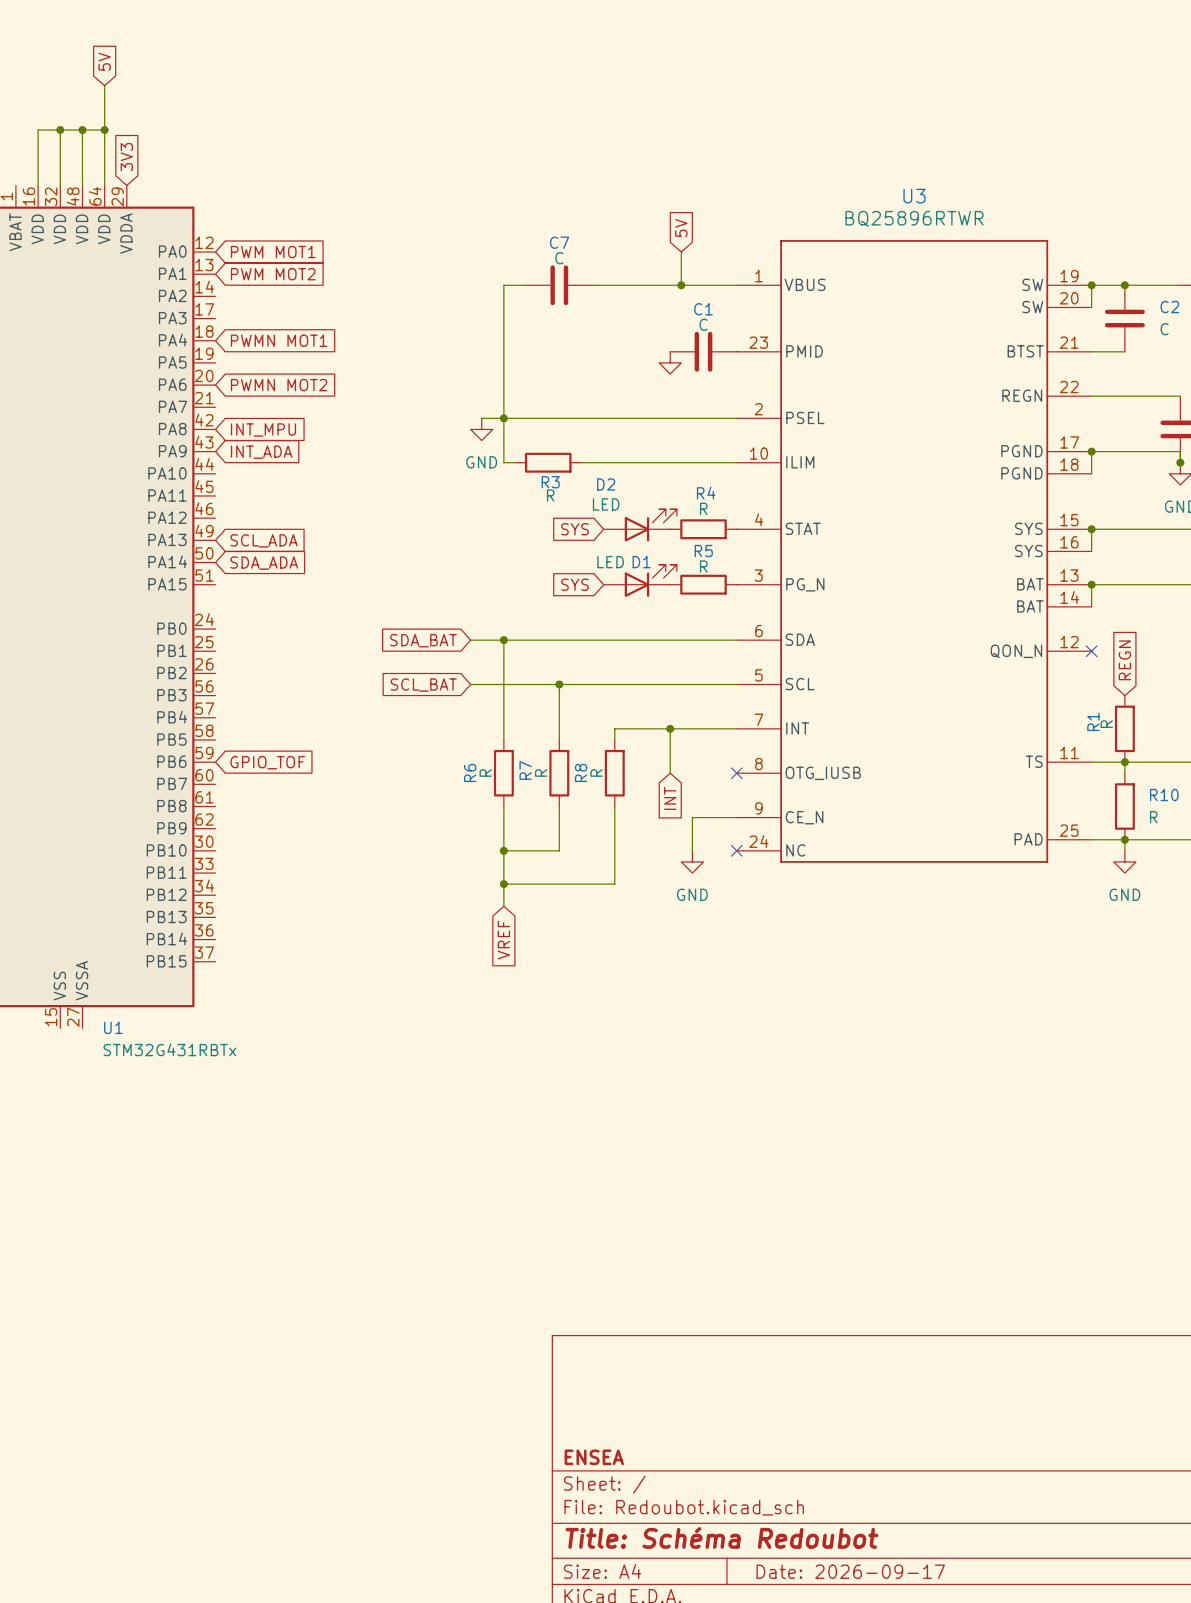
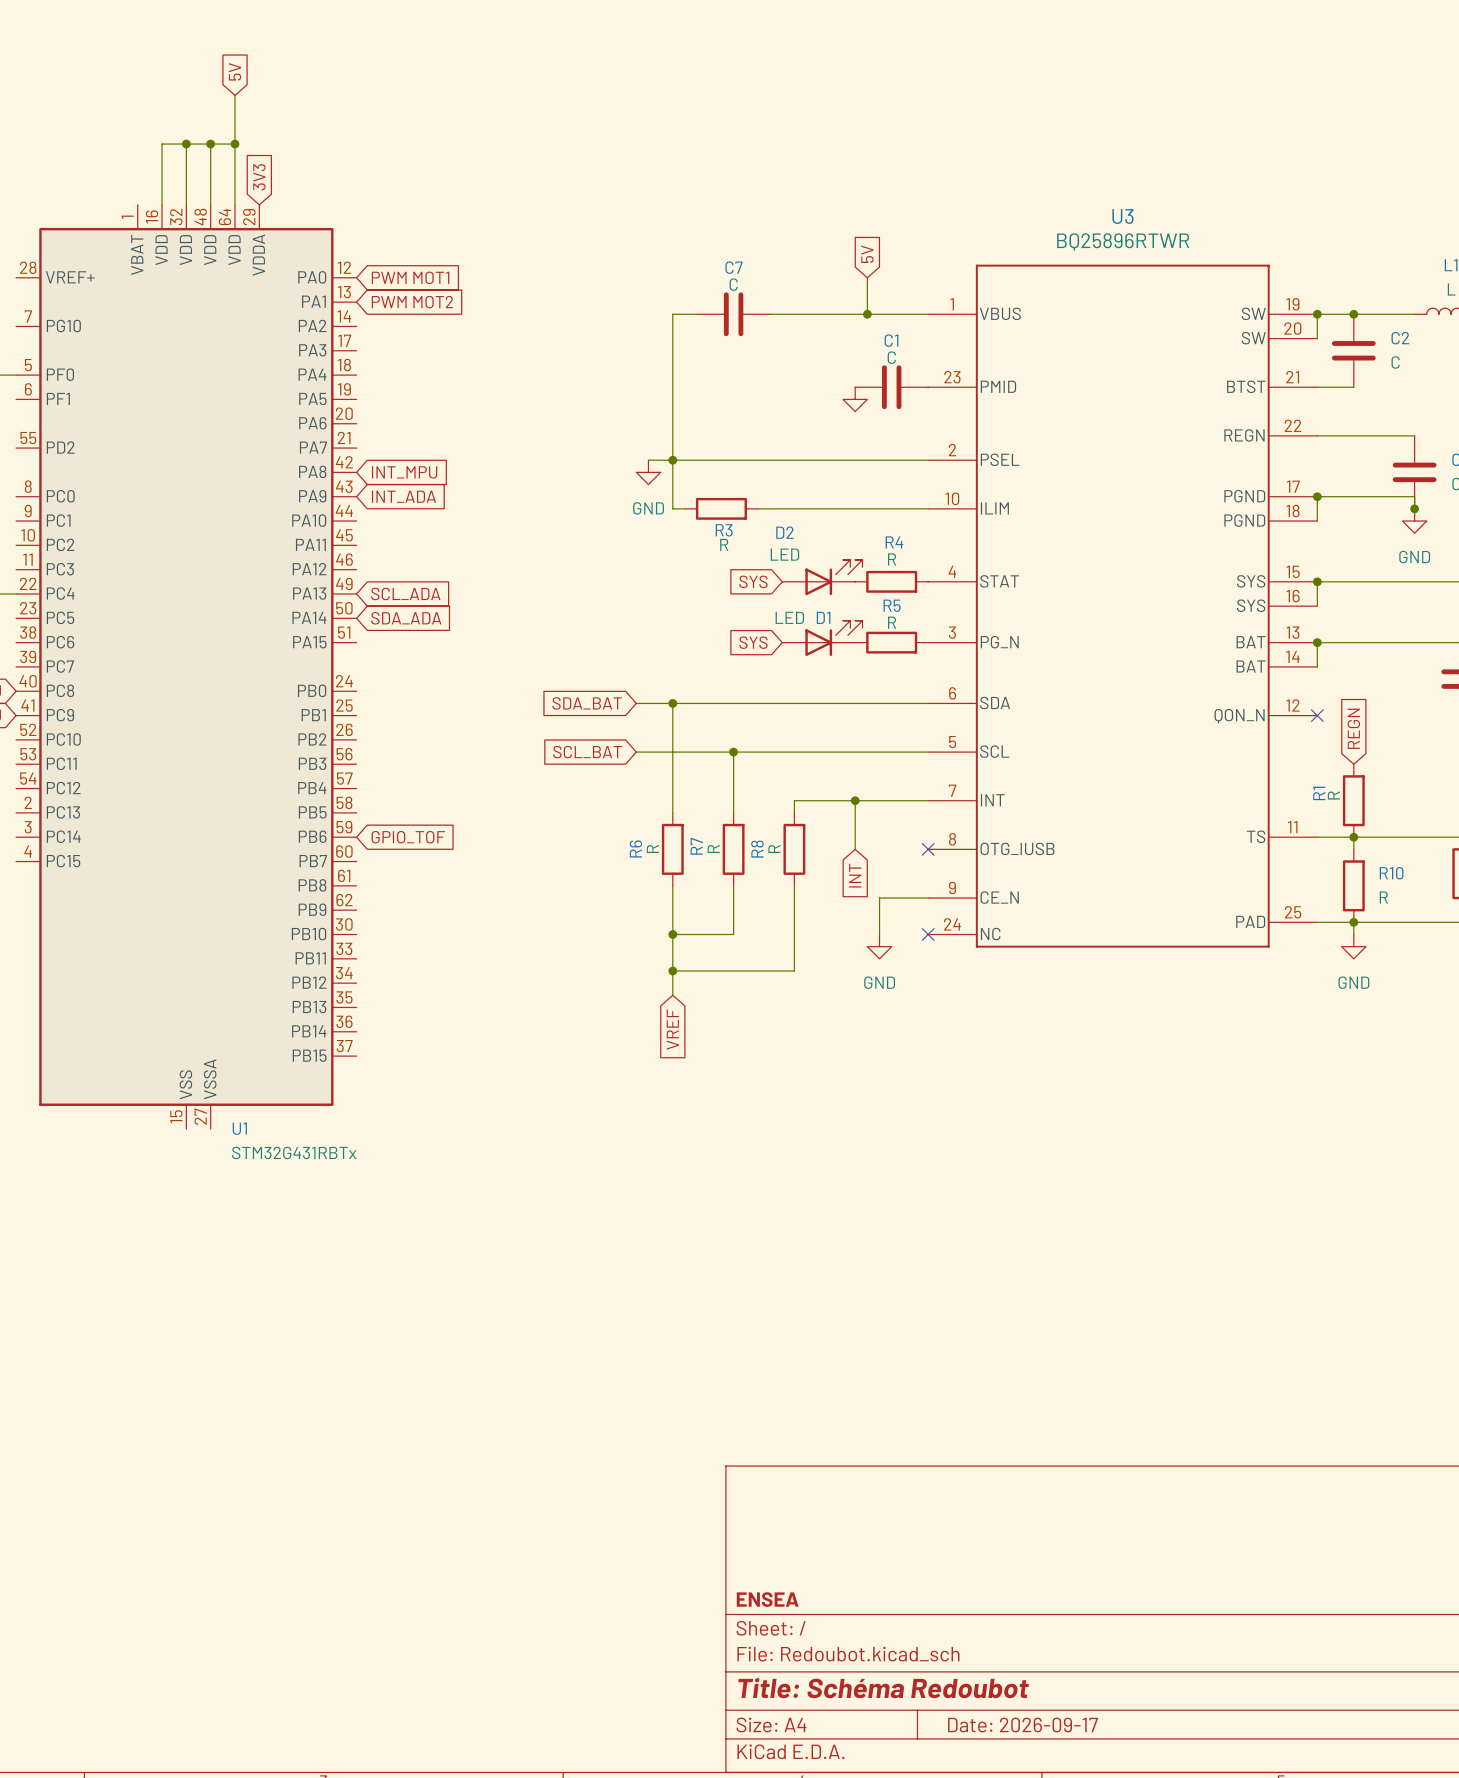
global label: PWMN MOT1 (279, 340) -> none
global label: PWMN MOT2 (279, 385) -> none

